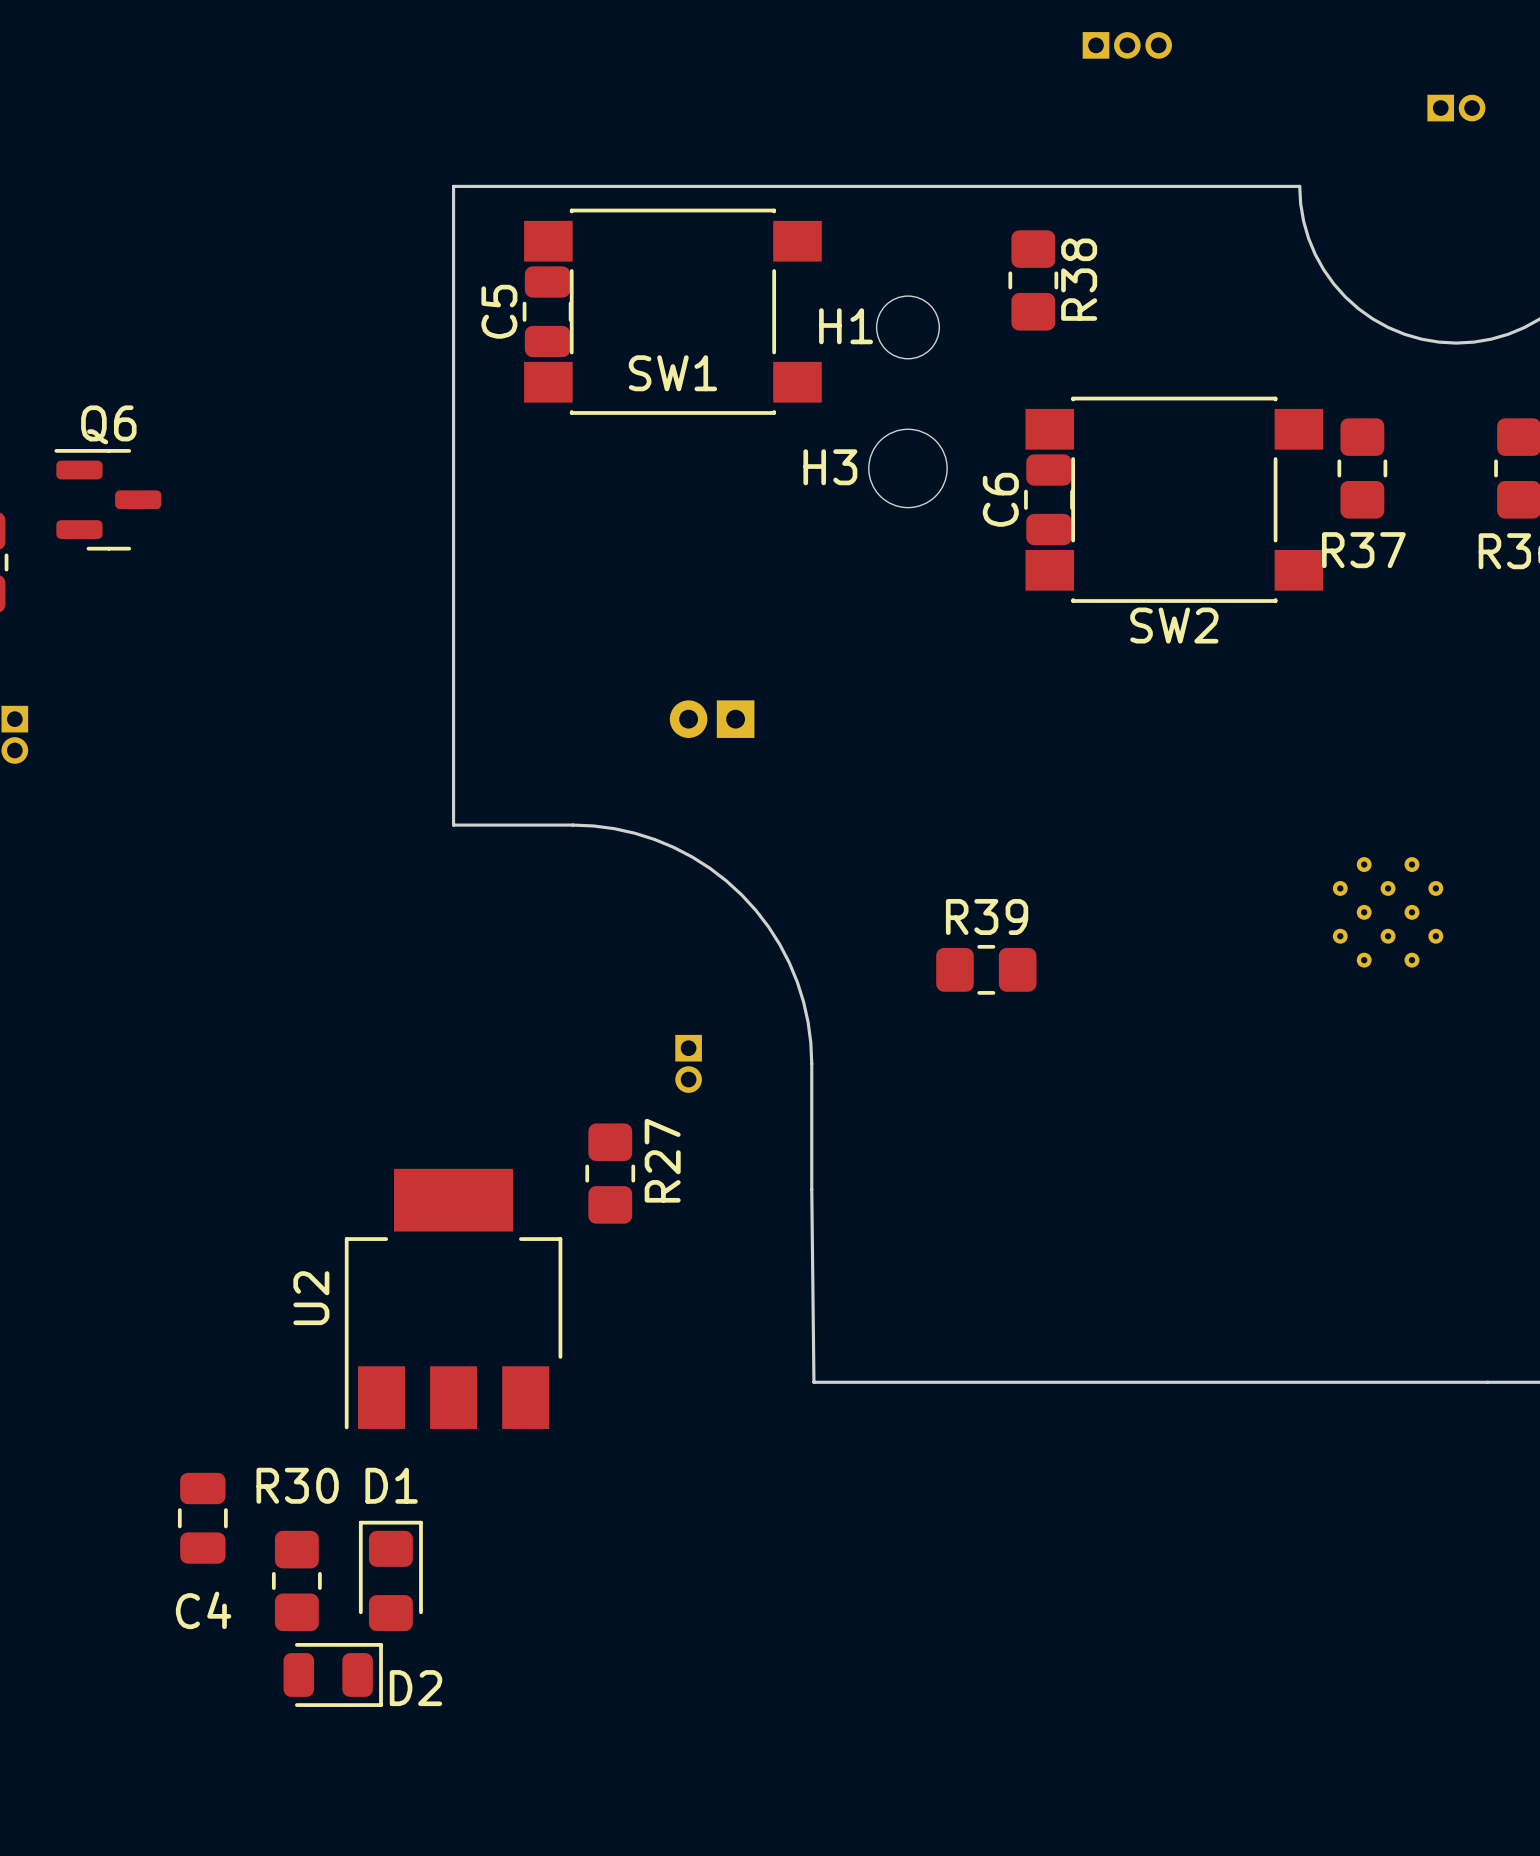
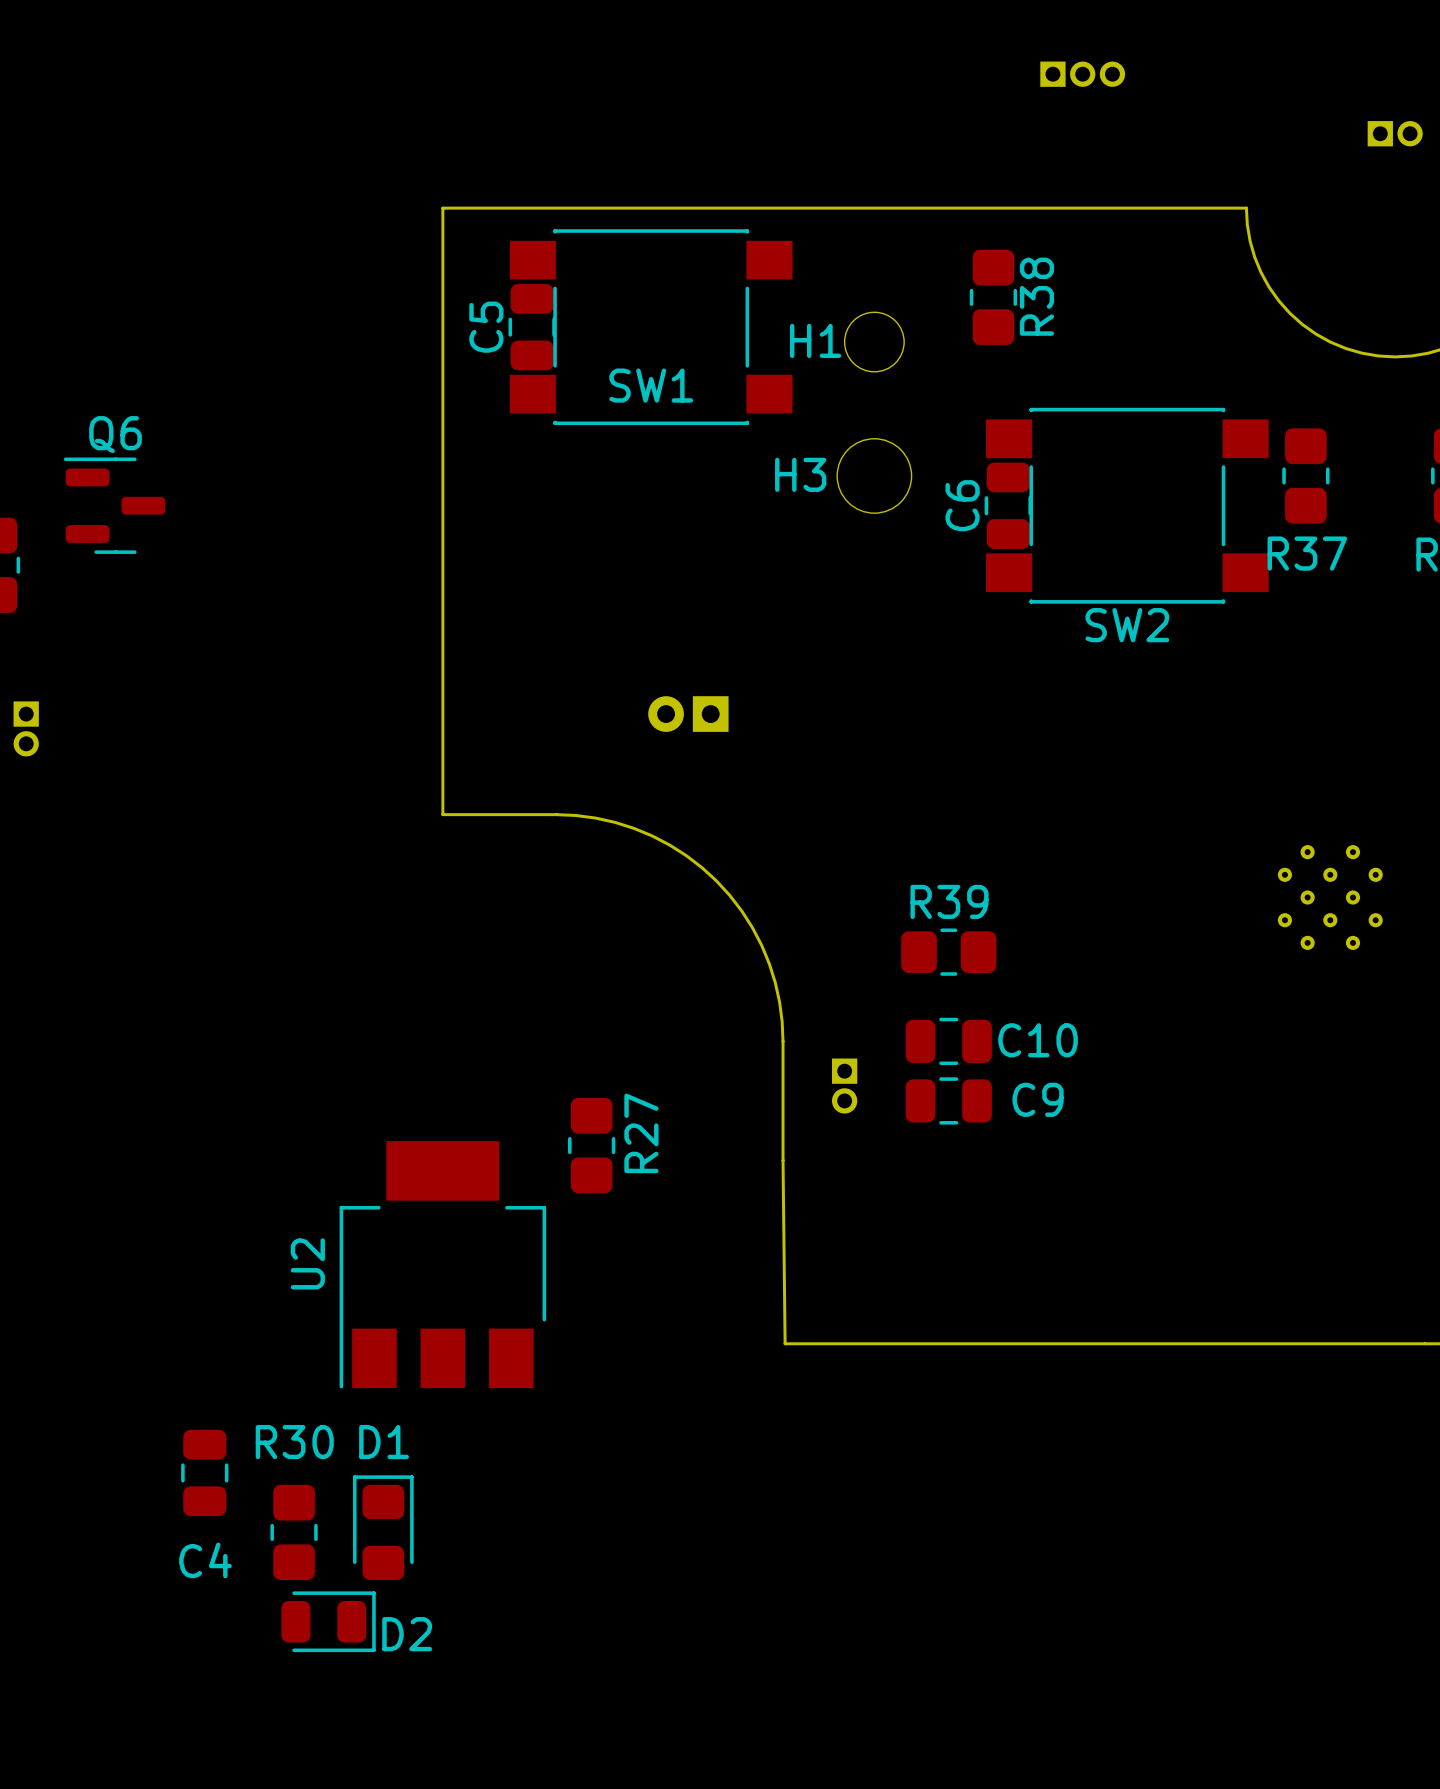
part position: (688, 1063) -> (844, 1086)
C10: none -> (948, 1041)
C9: none -> (948, 1100)

